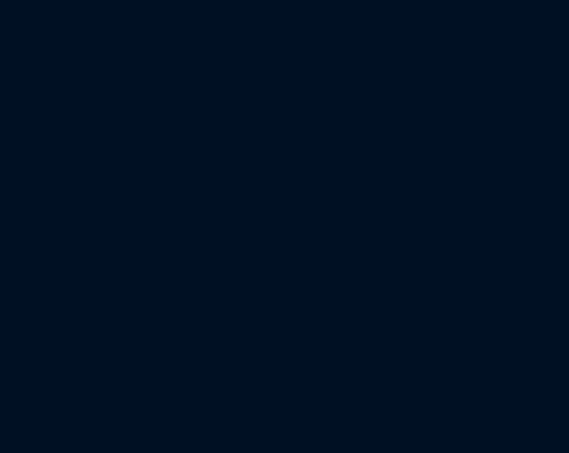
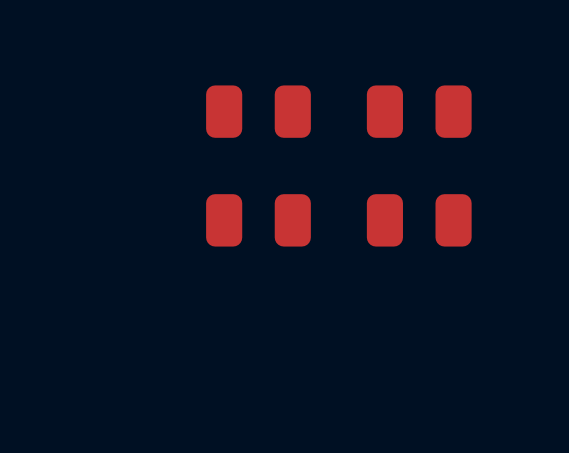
part: none -> (258, 111)
part: none -> (419, 111)
part: none -> (258, 220)
part: none -> (419, 220)

